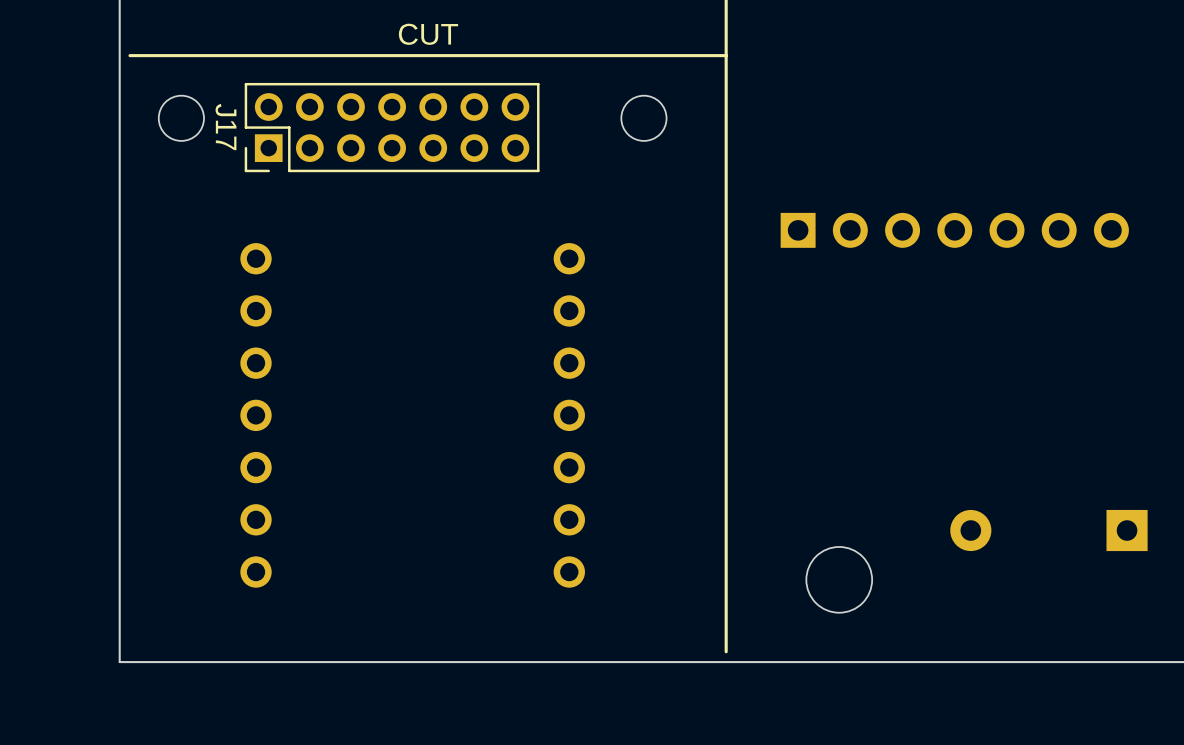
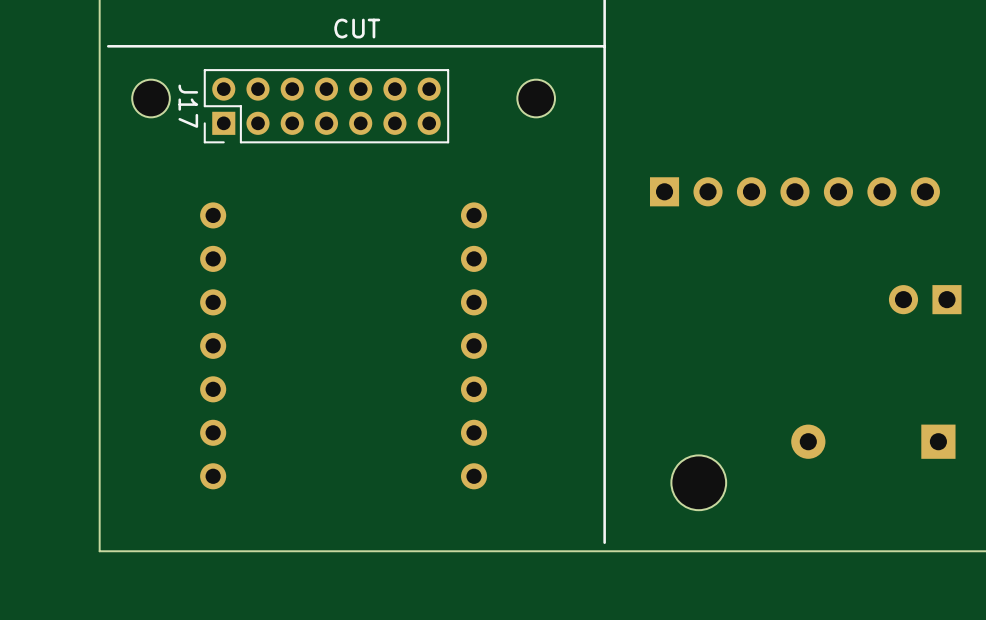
part: none -> (925, 299)

